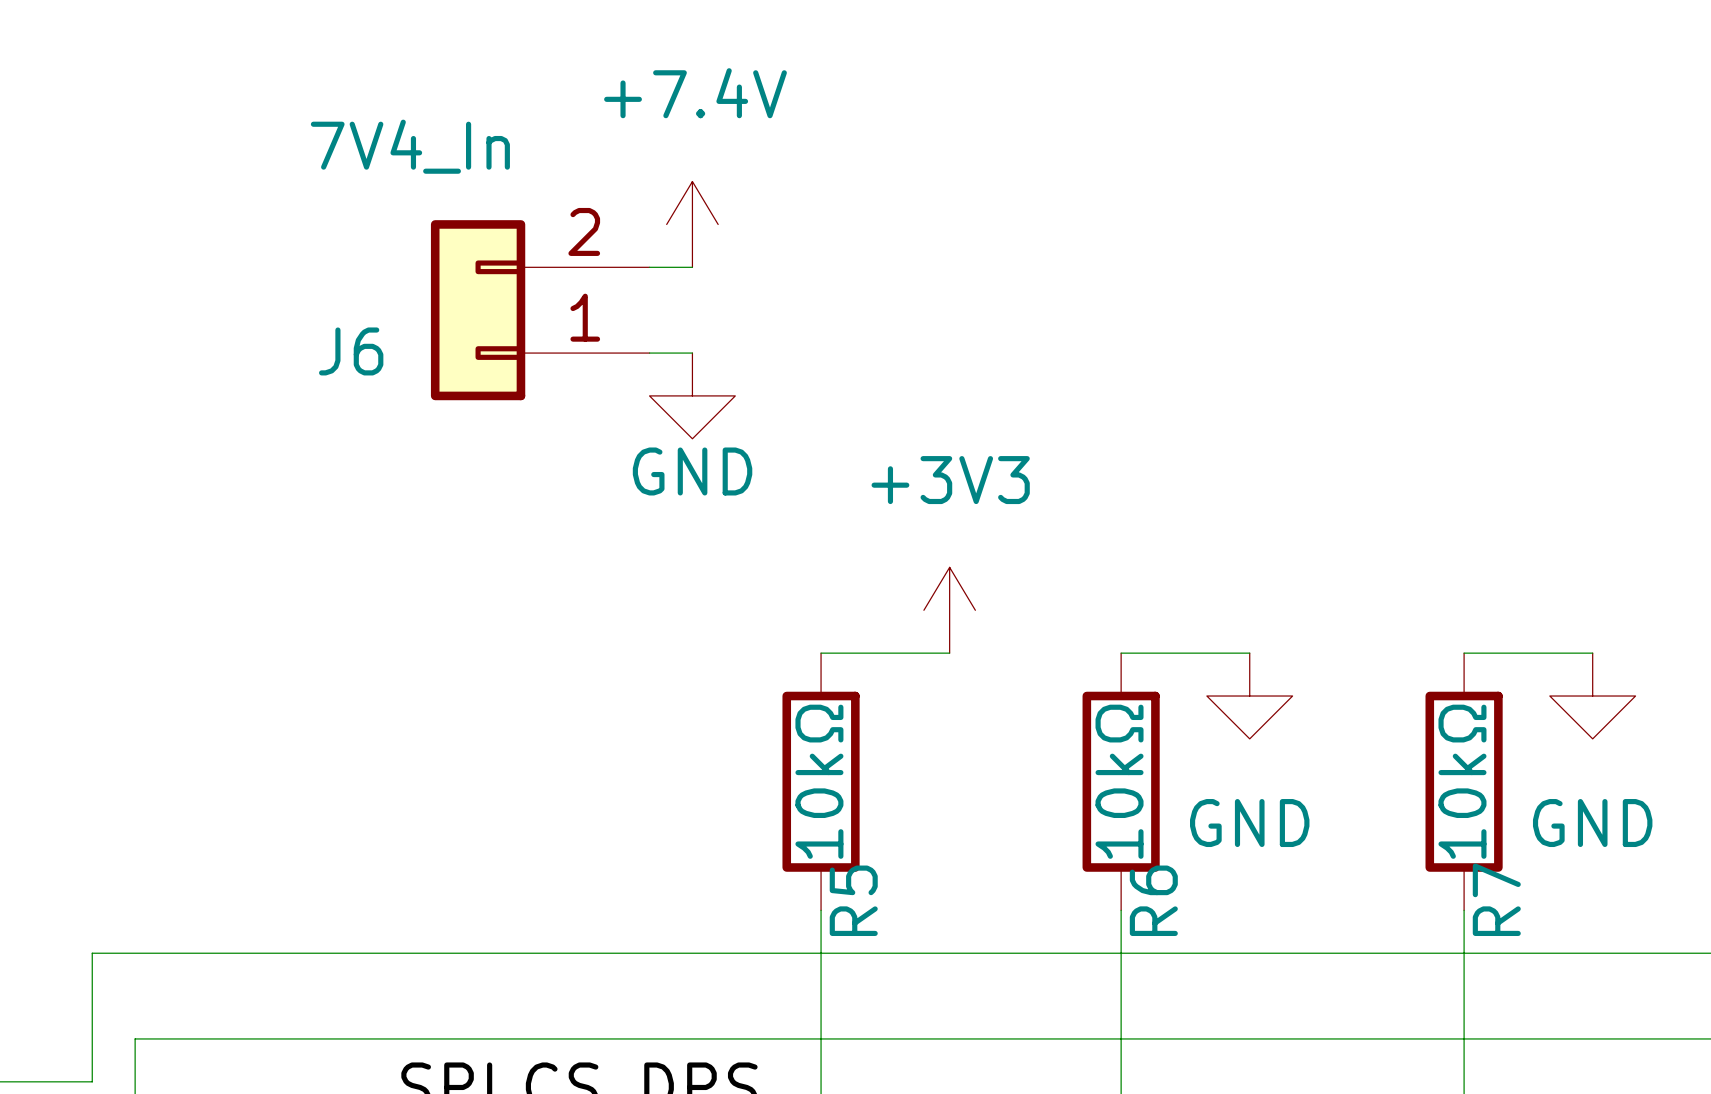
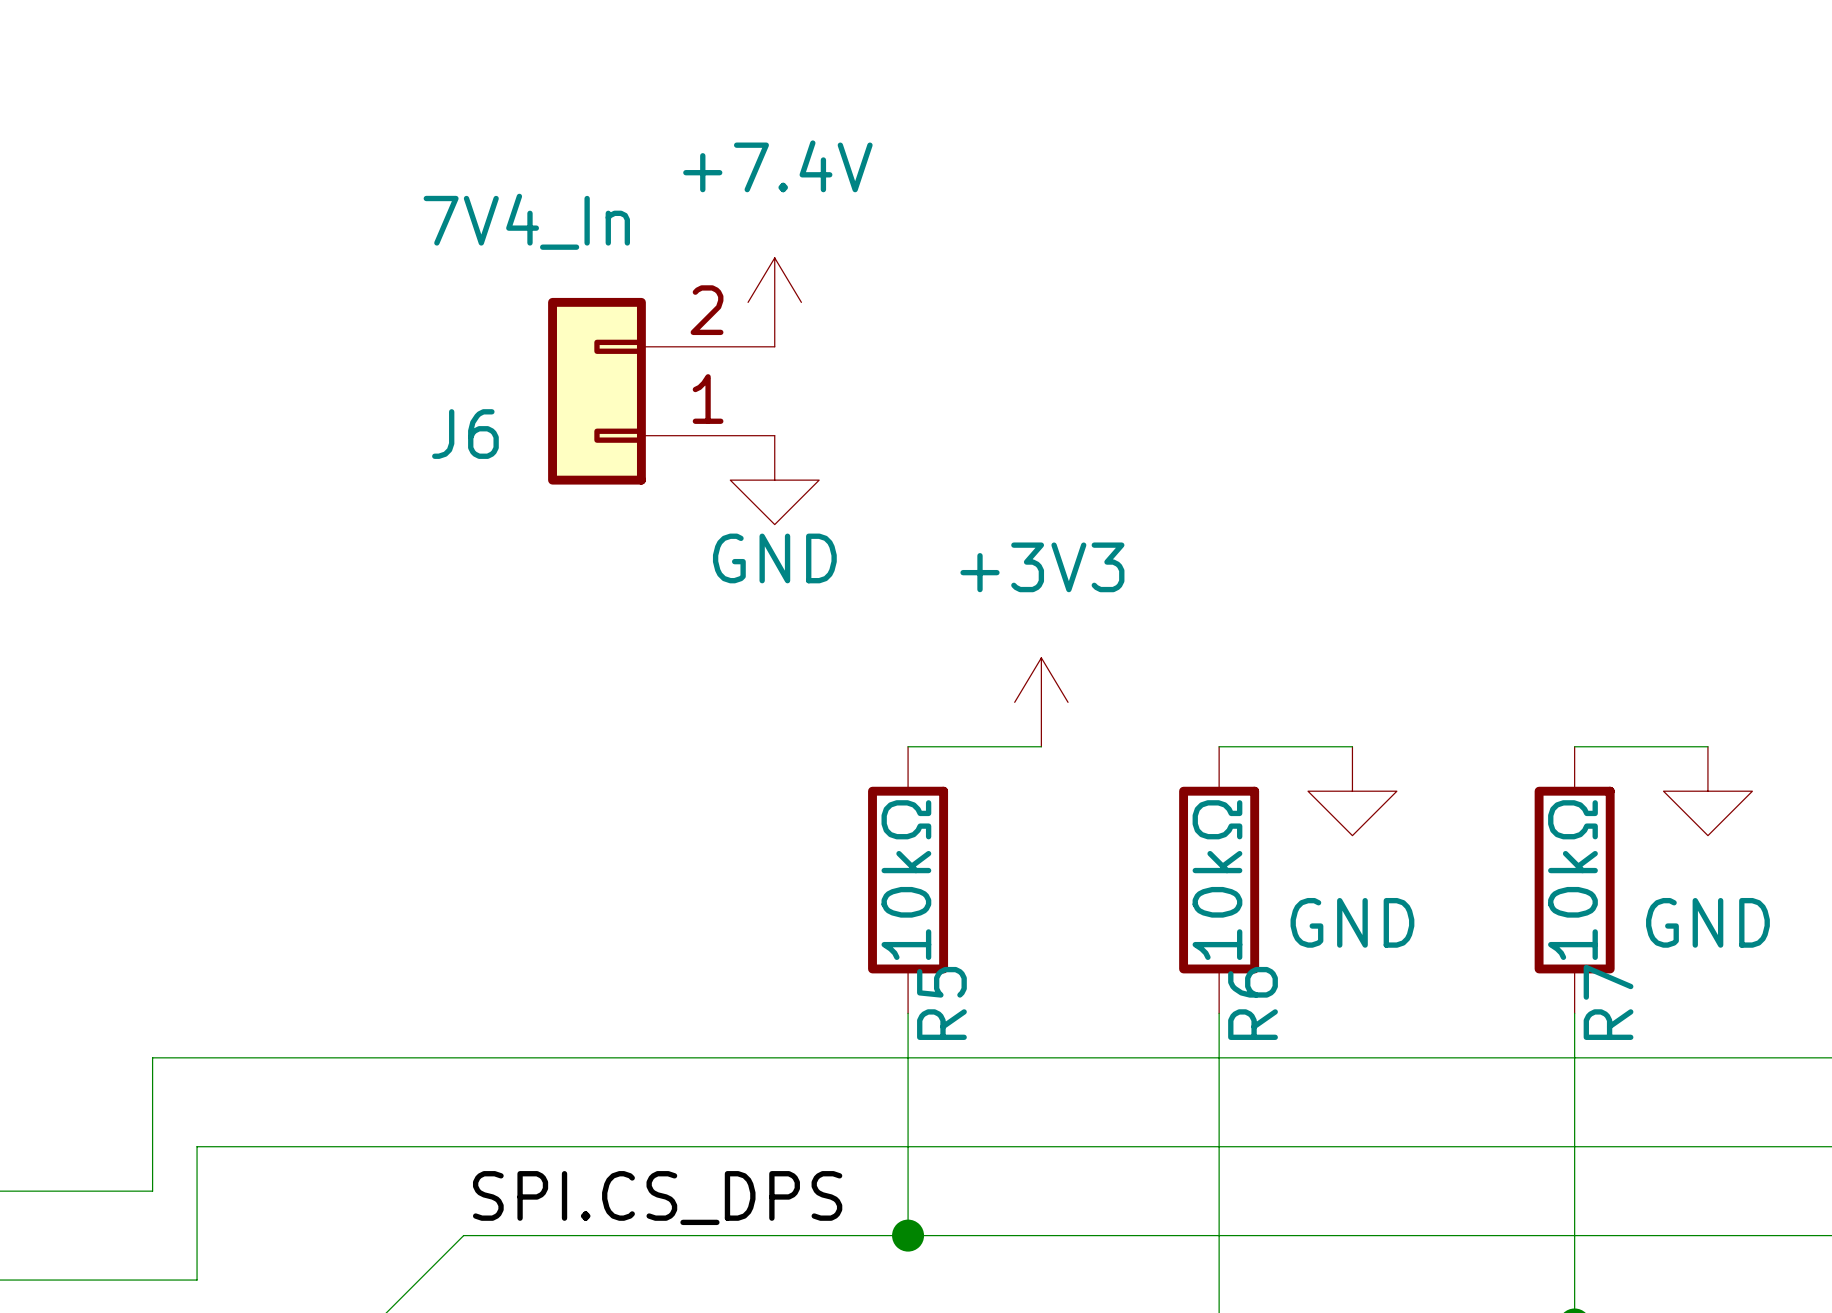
J6 position: (540, 310) -> (661, 391)

